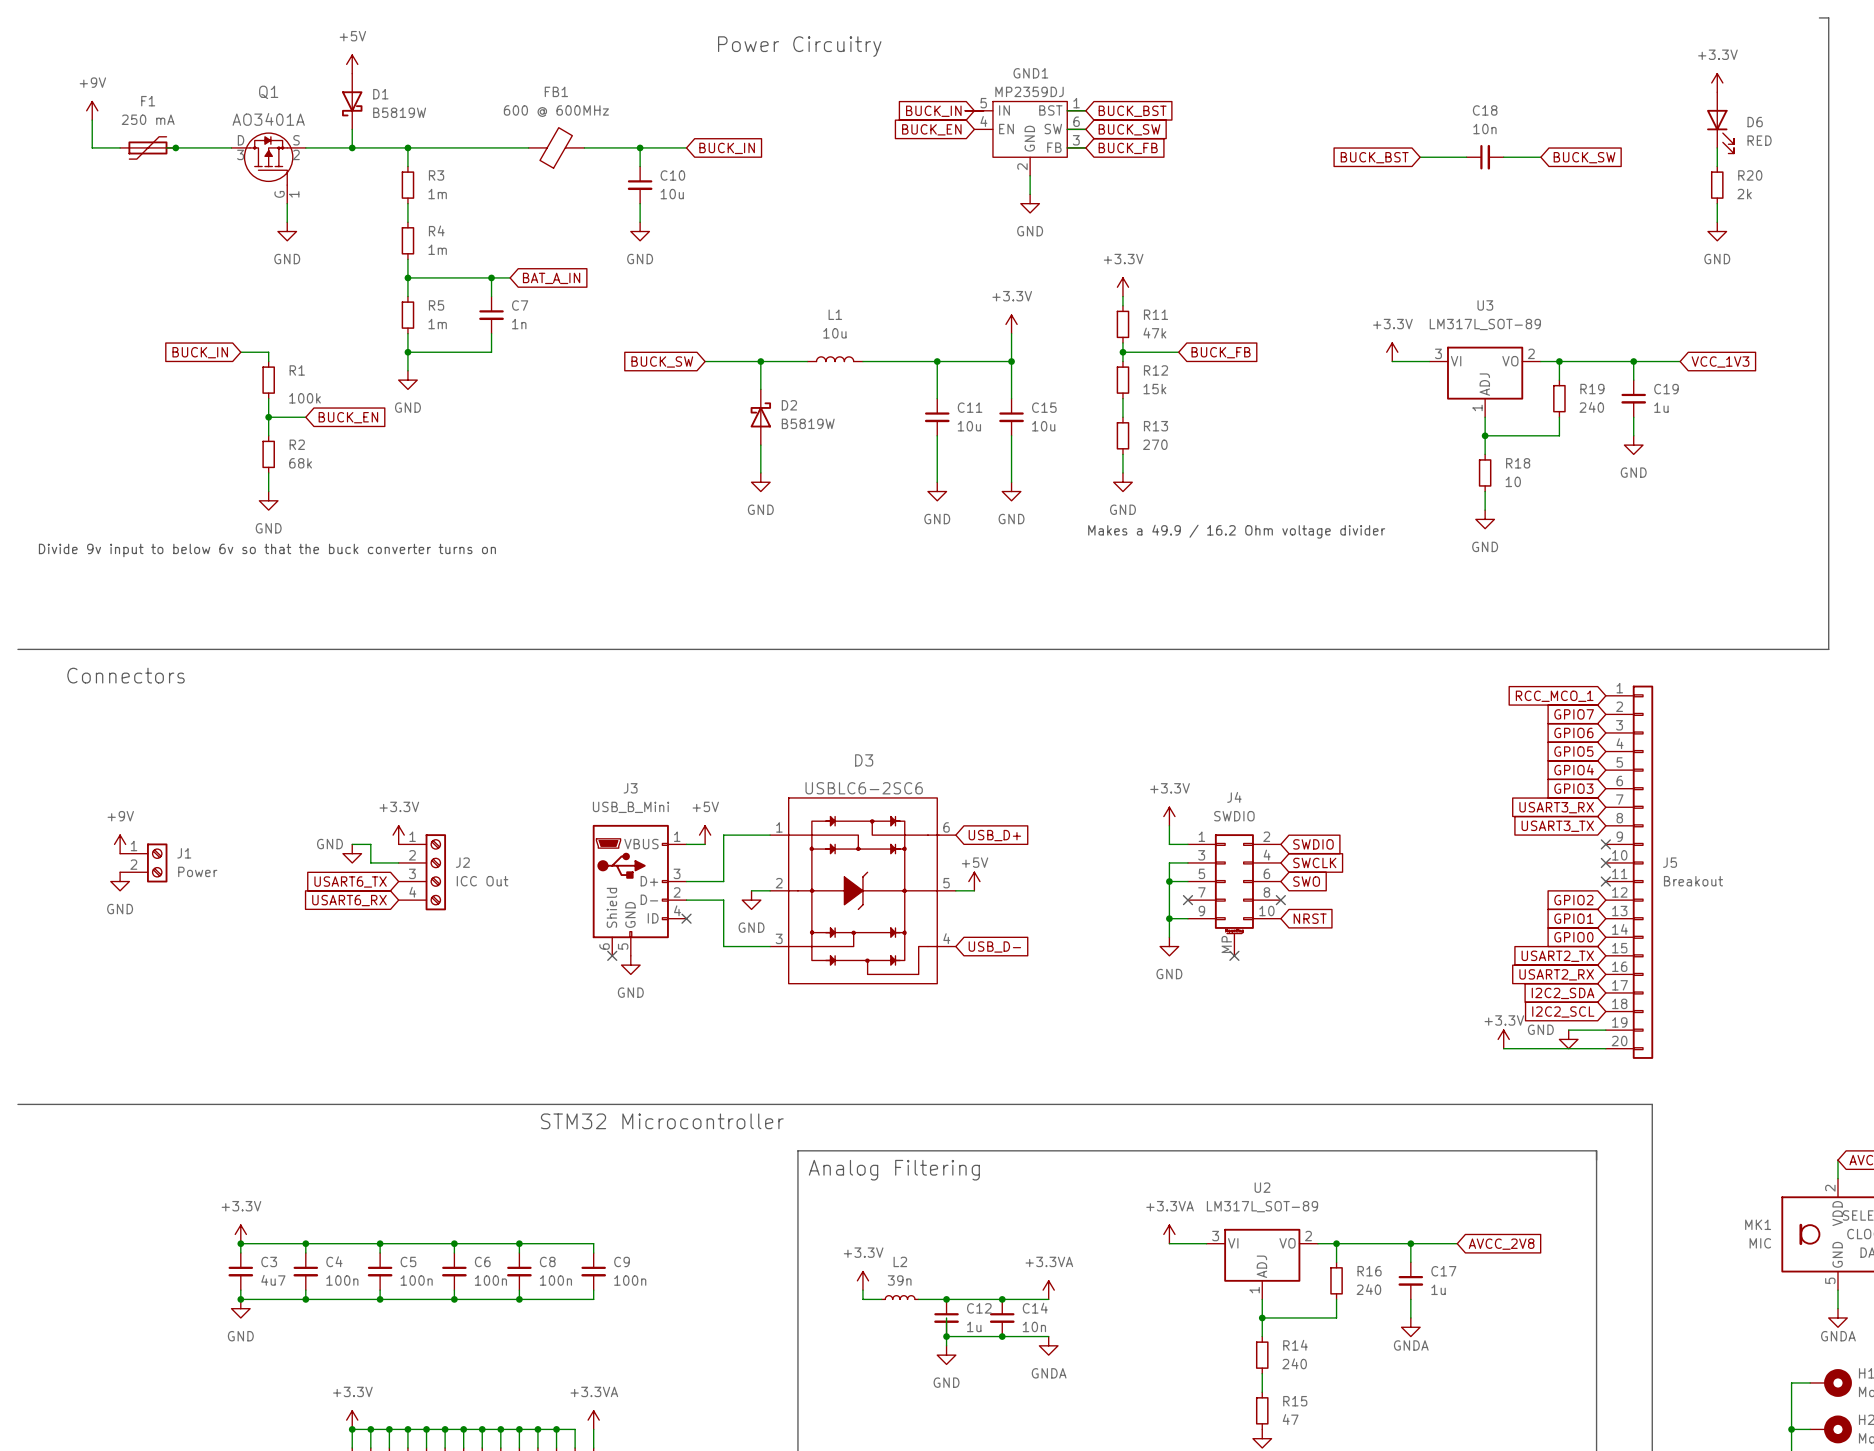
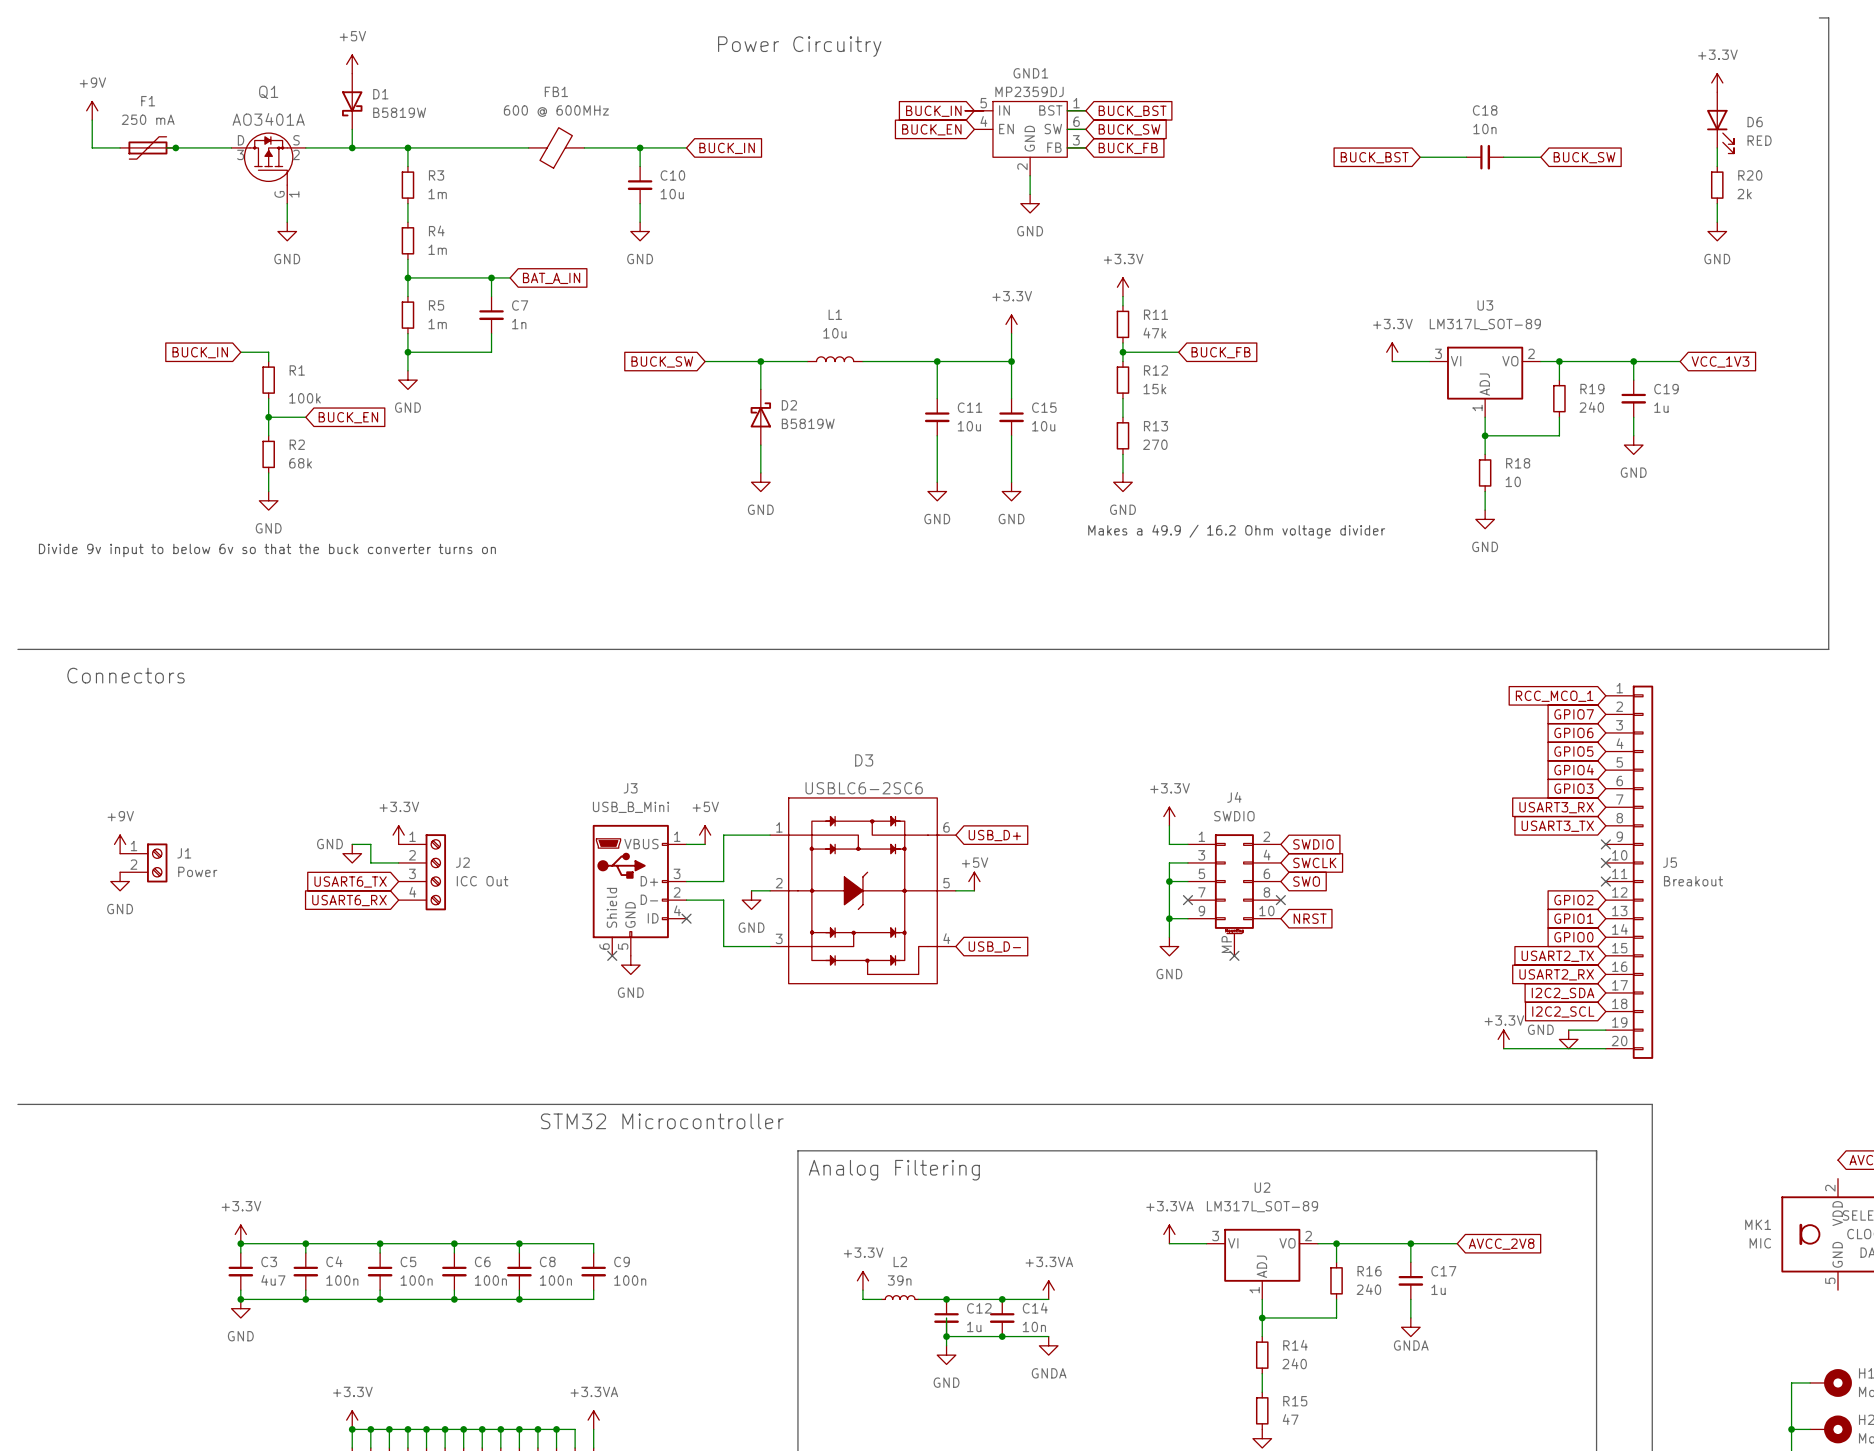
wire: (1837, 1160) (1837, 1178) -> none
wire: (1837, 1290) (1837, 1308) -> none
power symbol: GNDA (1837, 1317) -> none

